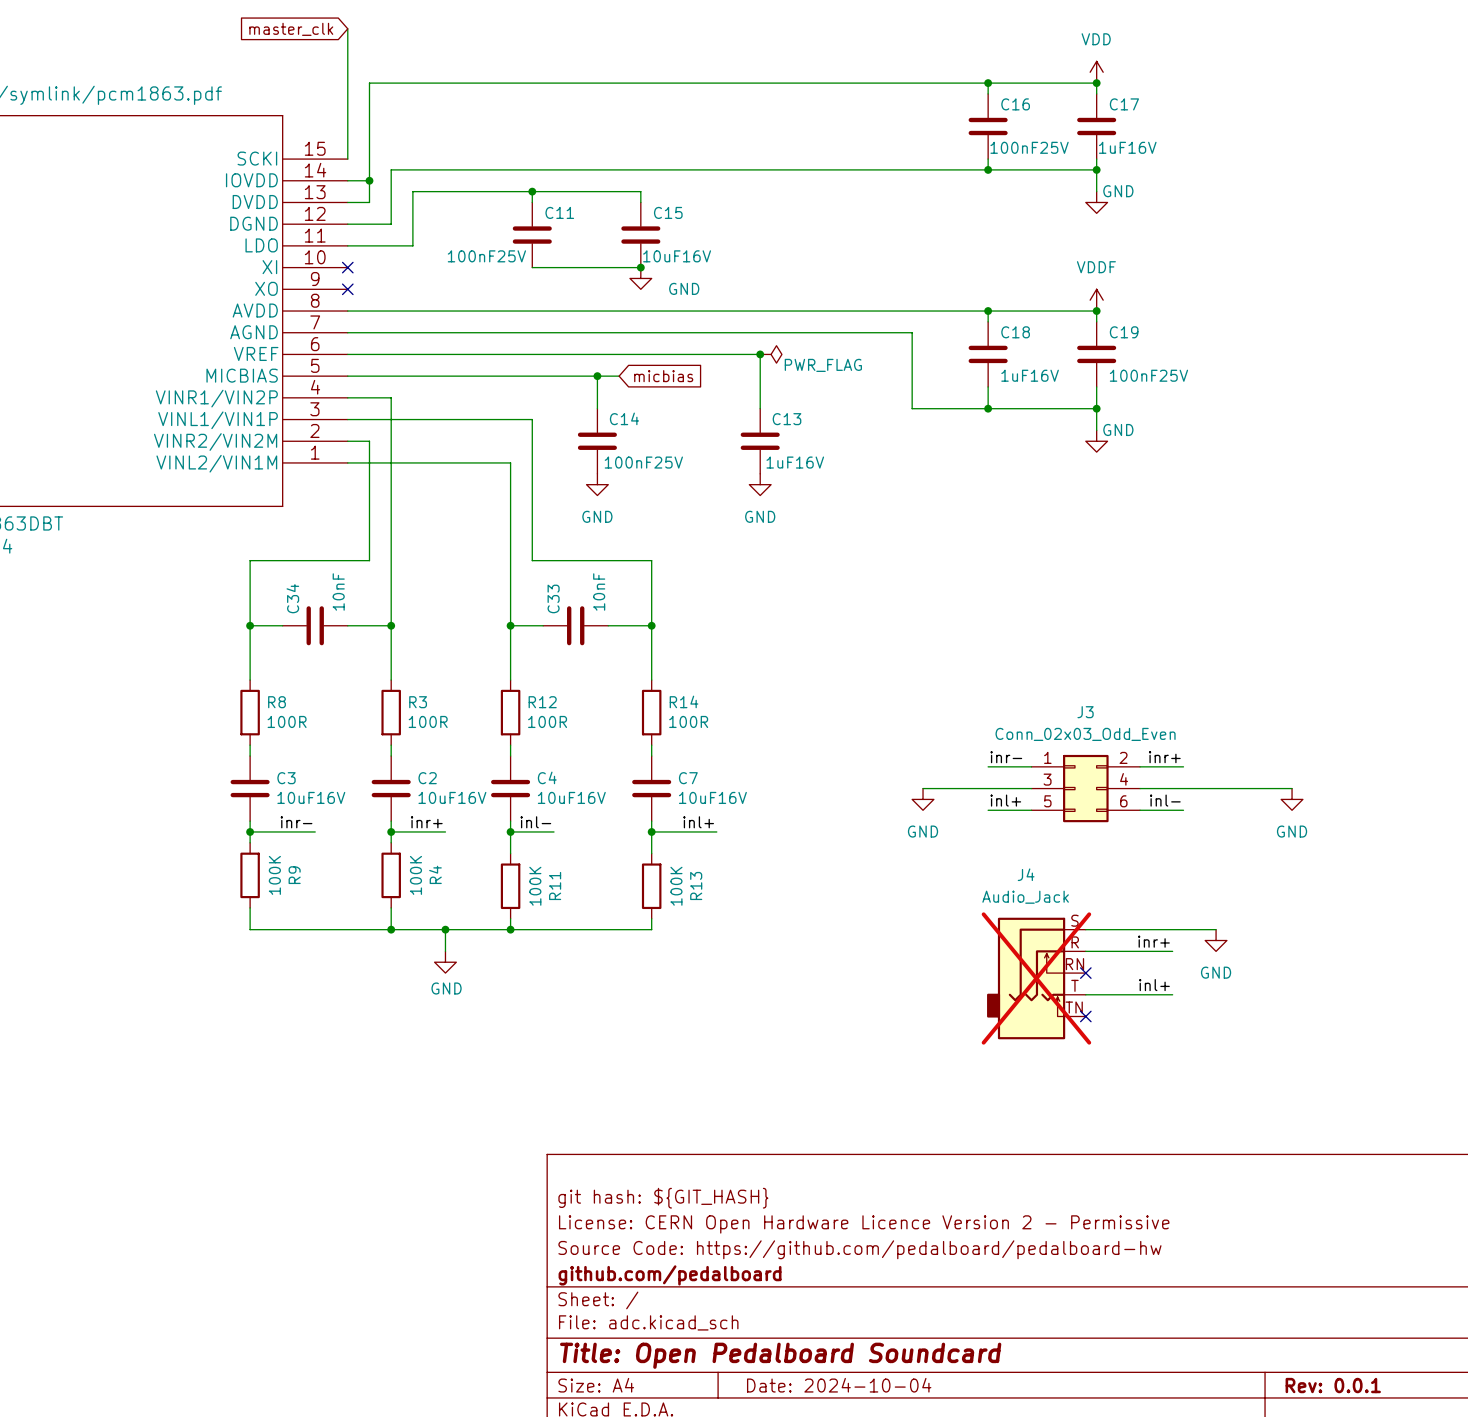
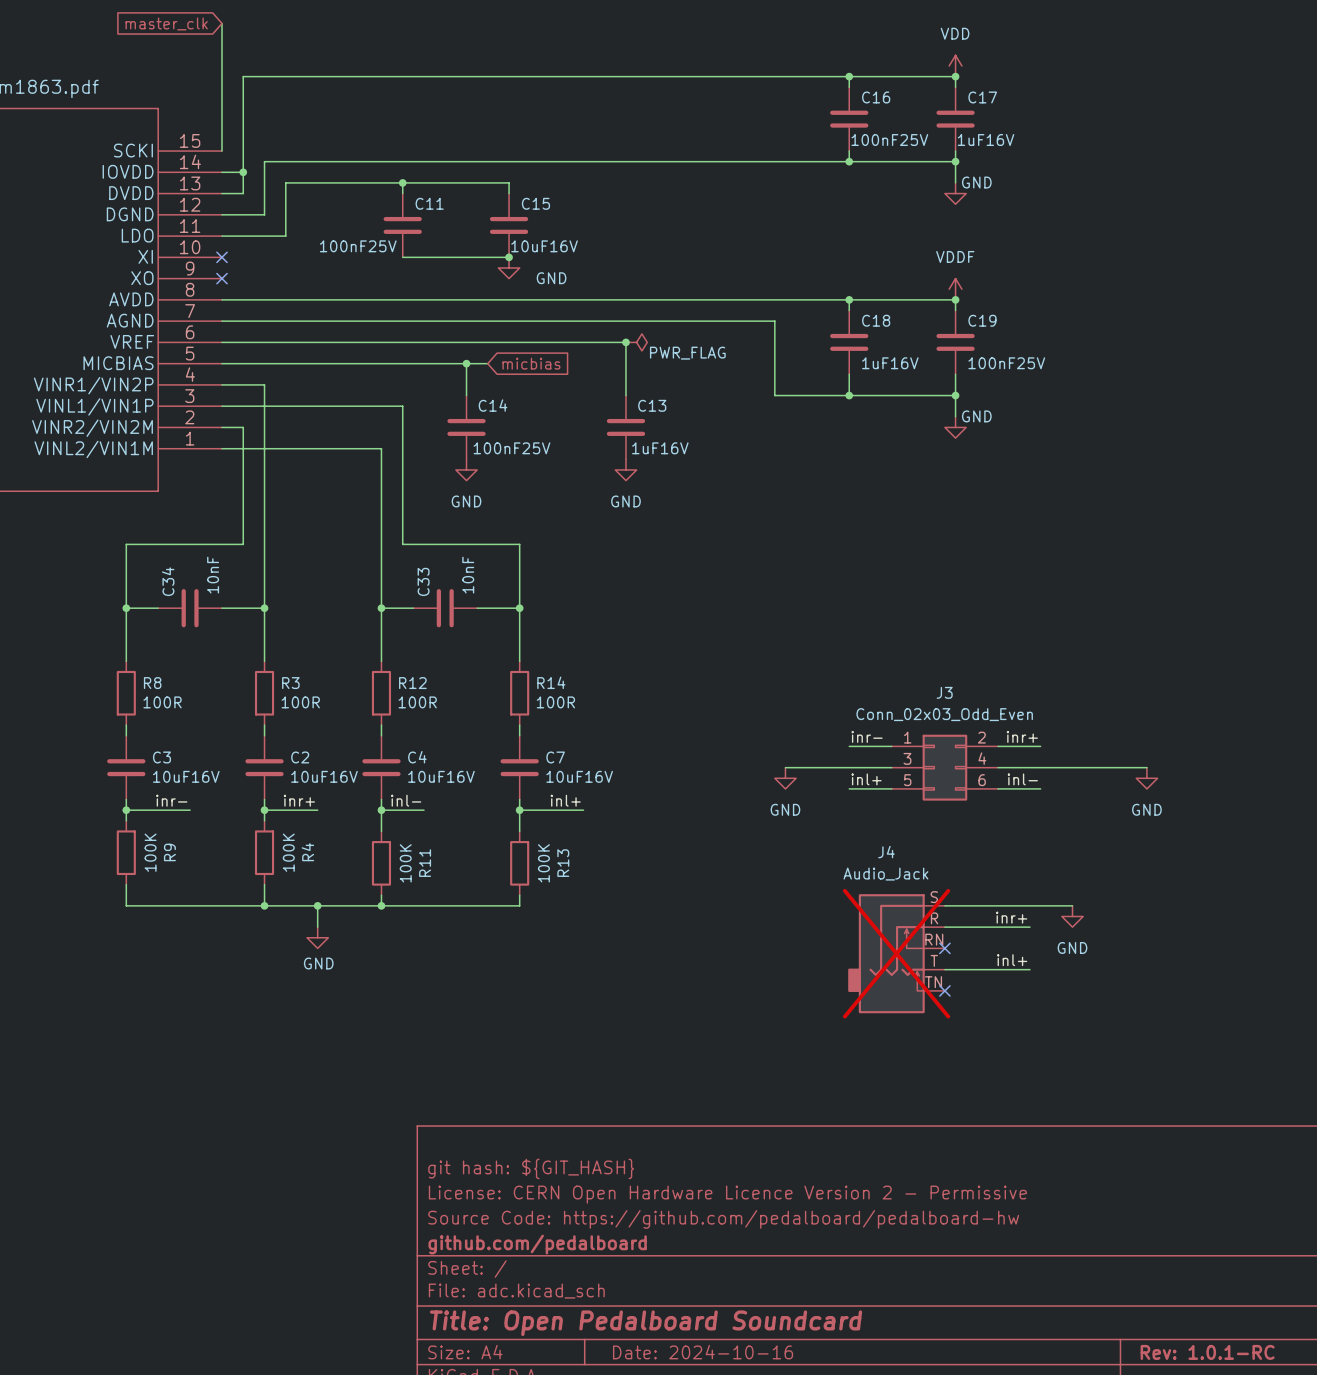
title block: Date: 2024-10-04 (839, 1385) -> Date: 2024-10-16 (703, 1352)
title block: Rev: 0.0.1 (1333, 1385) -> Rev: 1.0.1-RC (1207, 1352)

